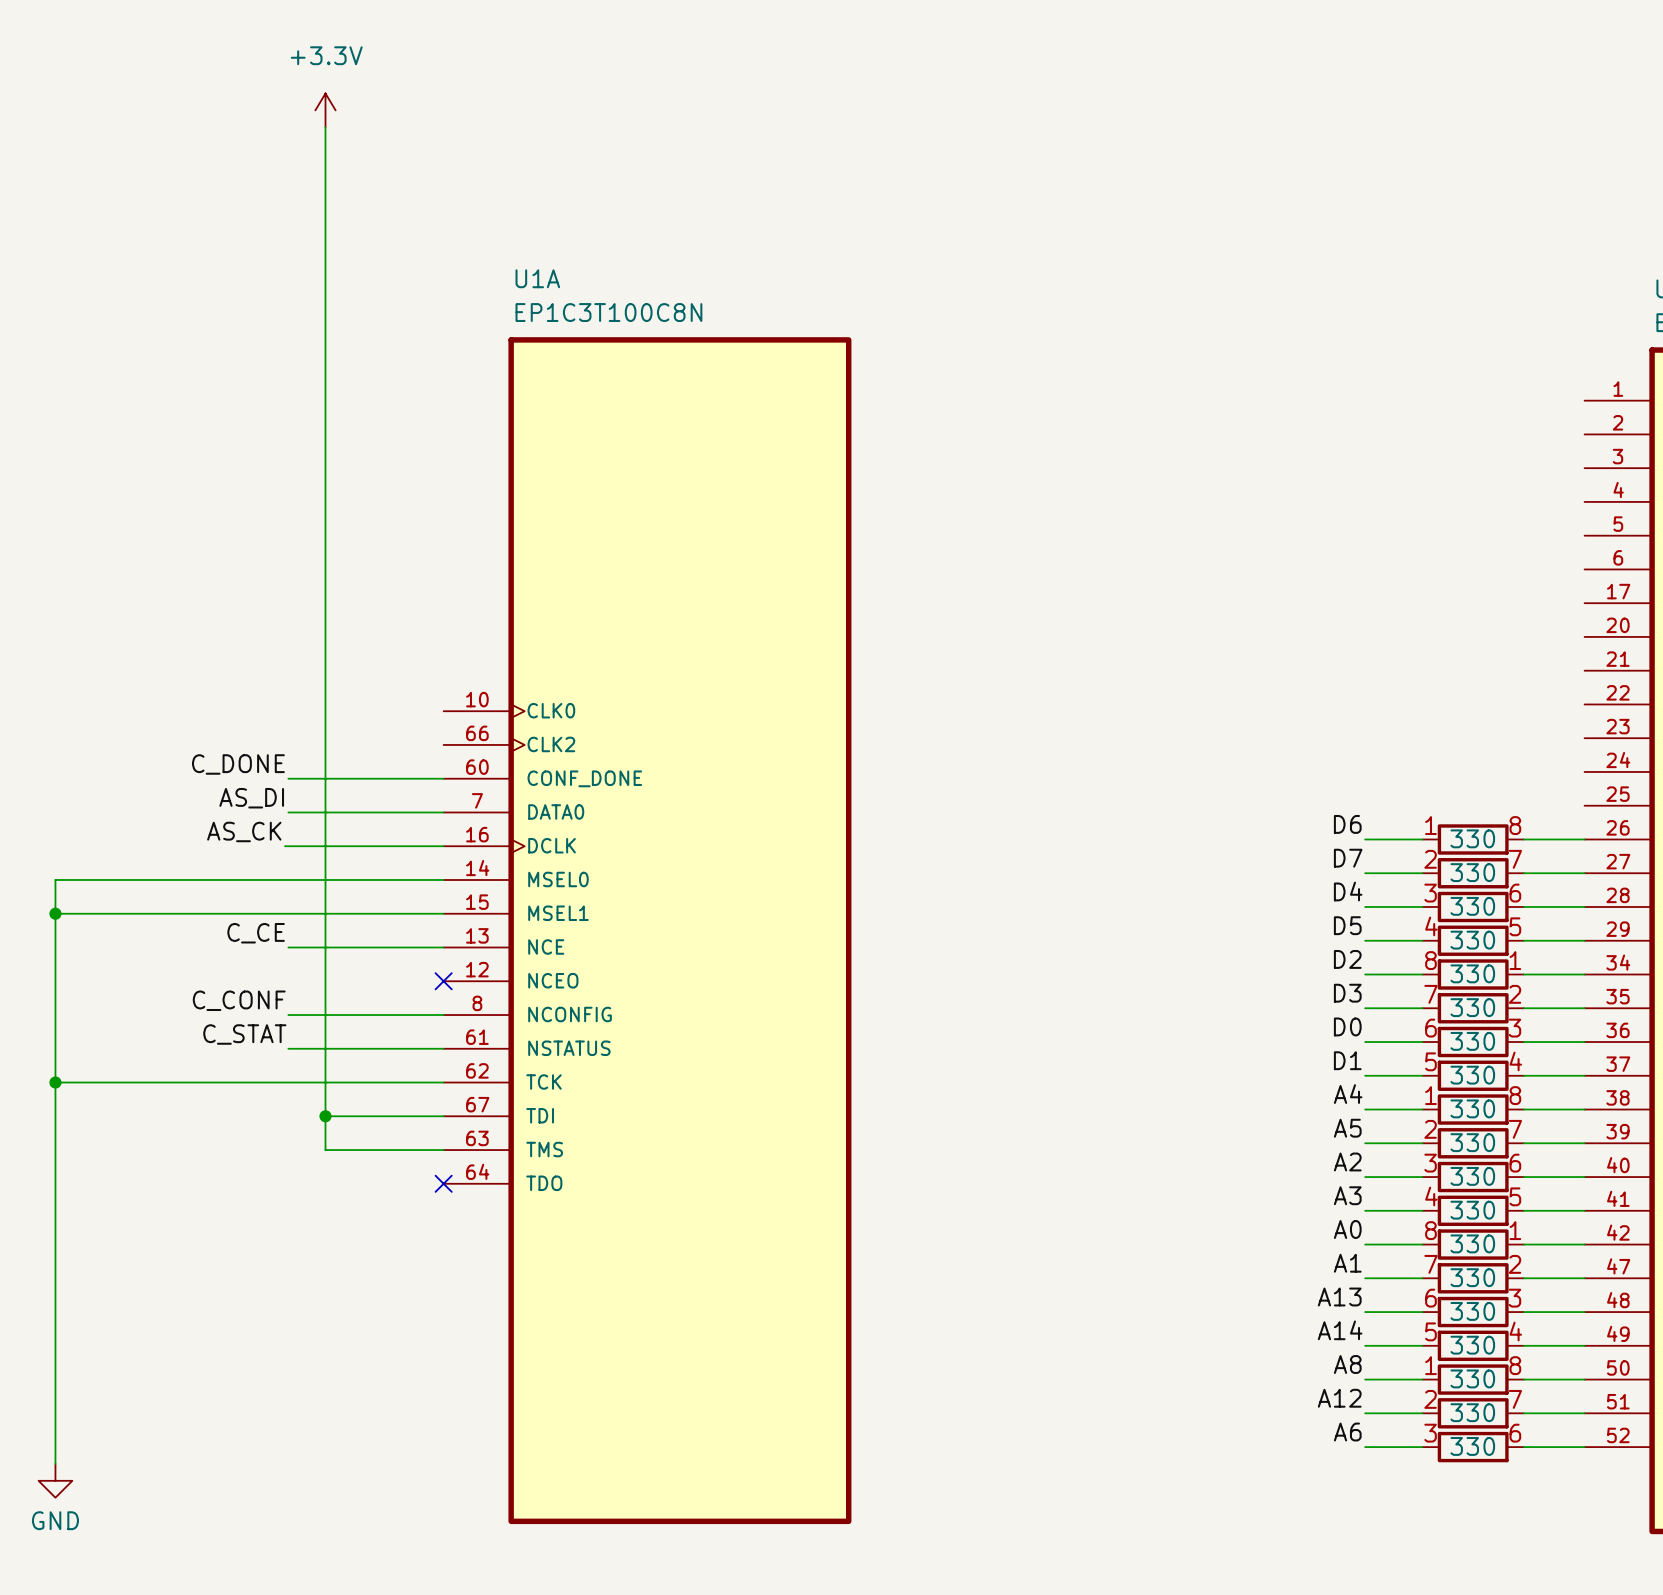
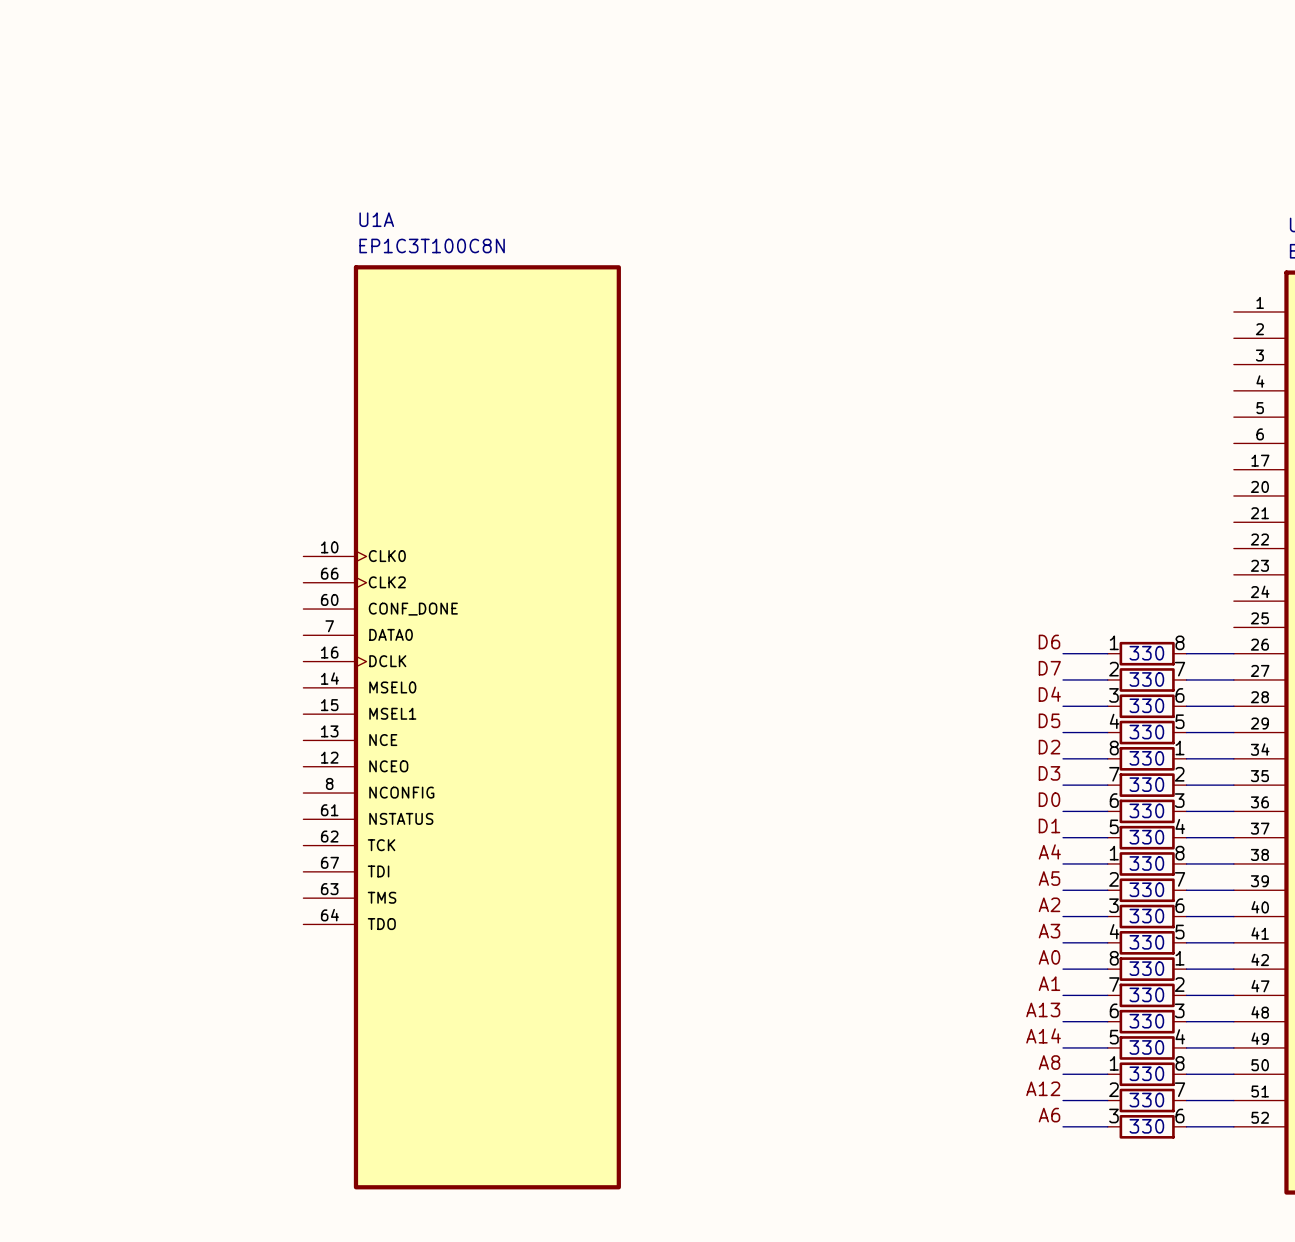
power symbol: +3.3V (325, 110) -> none
wire: (325, 127) (325, 1150) (443, 1150) -> none
label: C_DONE (238, 764) -> none
wire: (288, 778) (443, 778) -> none
label: AS_DI (251, 798) -> none
wire: (288, 812) (443, 812) -> none
label: AS_CK (244, 831) -> none
wire: (285, 846) (443, 846) -> none
wire: (443, 879) (55, 879) (55, 1463) -> none
wire: (55, 913) (443, 913) -> none
junction: (55, 913) -> none
U1A position: (647, 930) -> (462, 727)
label: C_CE (256, 933) -> none
wire: (288, 947) (443, 947) -> none
no-connect mark: (443, 981) -> none
label: C_CONF (239, 1000) -> none
wire: (288, 1015) (443, 1015) -> none
label: C_STAT (244, 1034) -> none
wire: (288, 1048) (443, 1048) -> none
wire: (55, 1082) (443, 1082) -> none
junction: (55, 1082) -> none
wire: (325, 1116) (443, 1116) -> none
junction: (325, 1116) -> none
no-connect mark: (443, 1183) -> none
power symbol: GND (55, 1480) -> none

